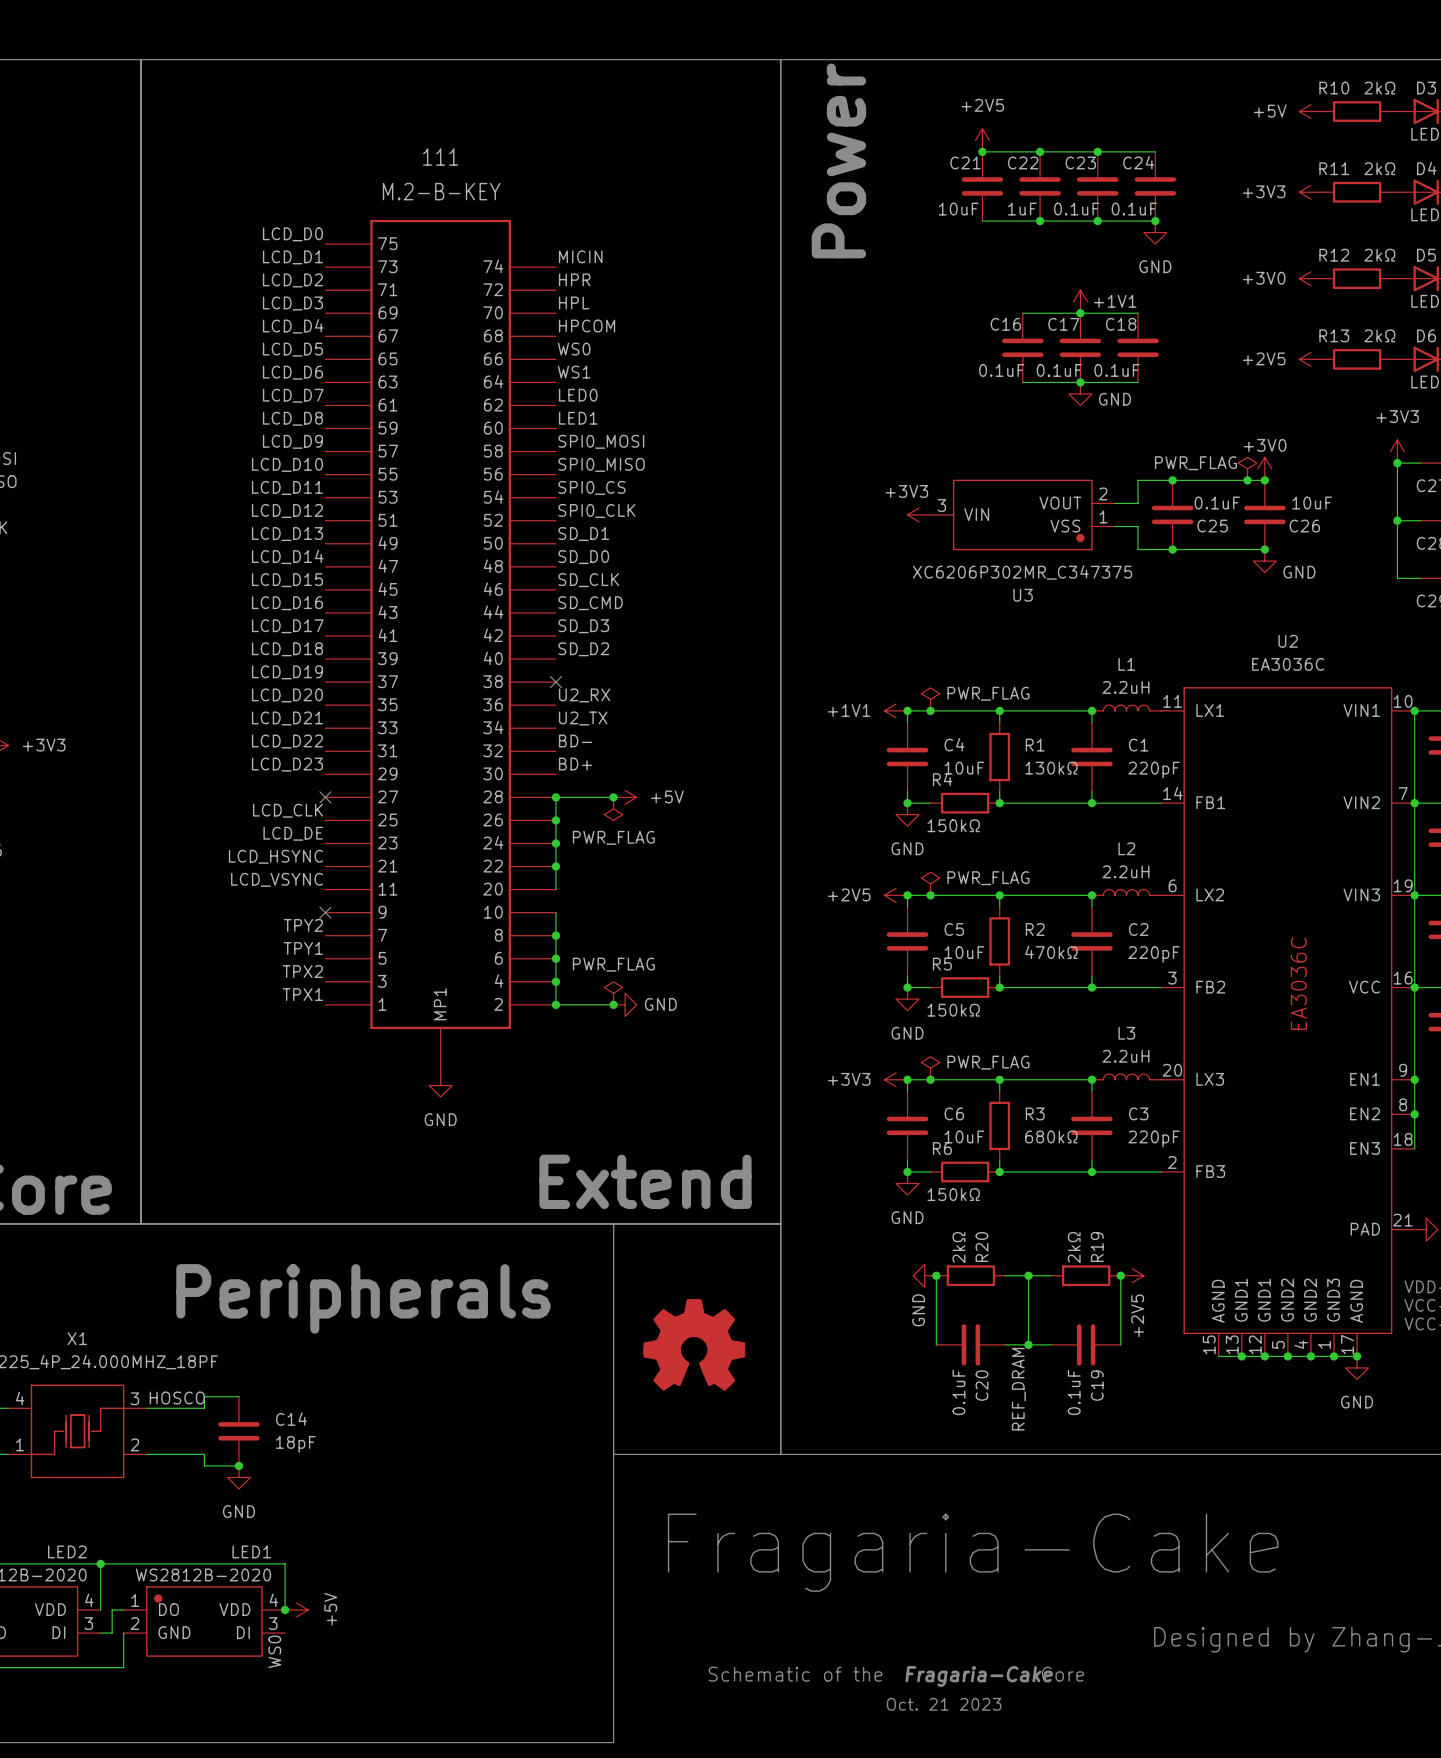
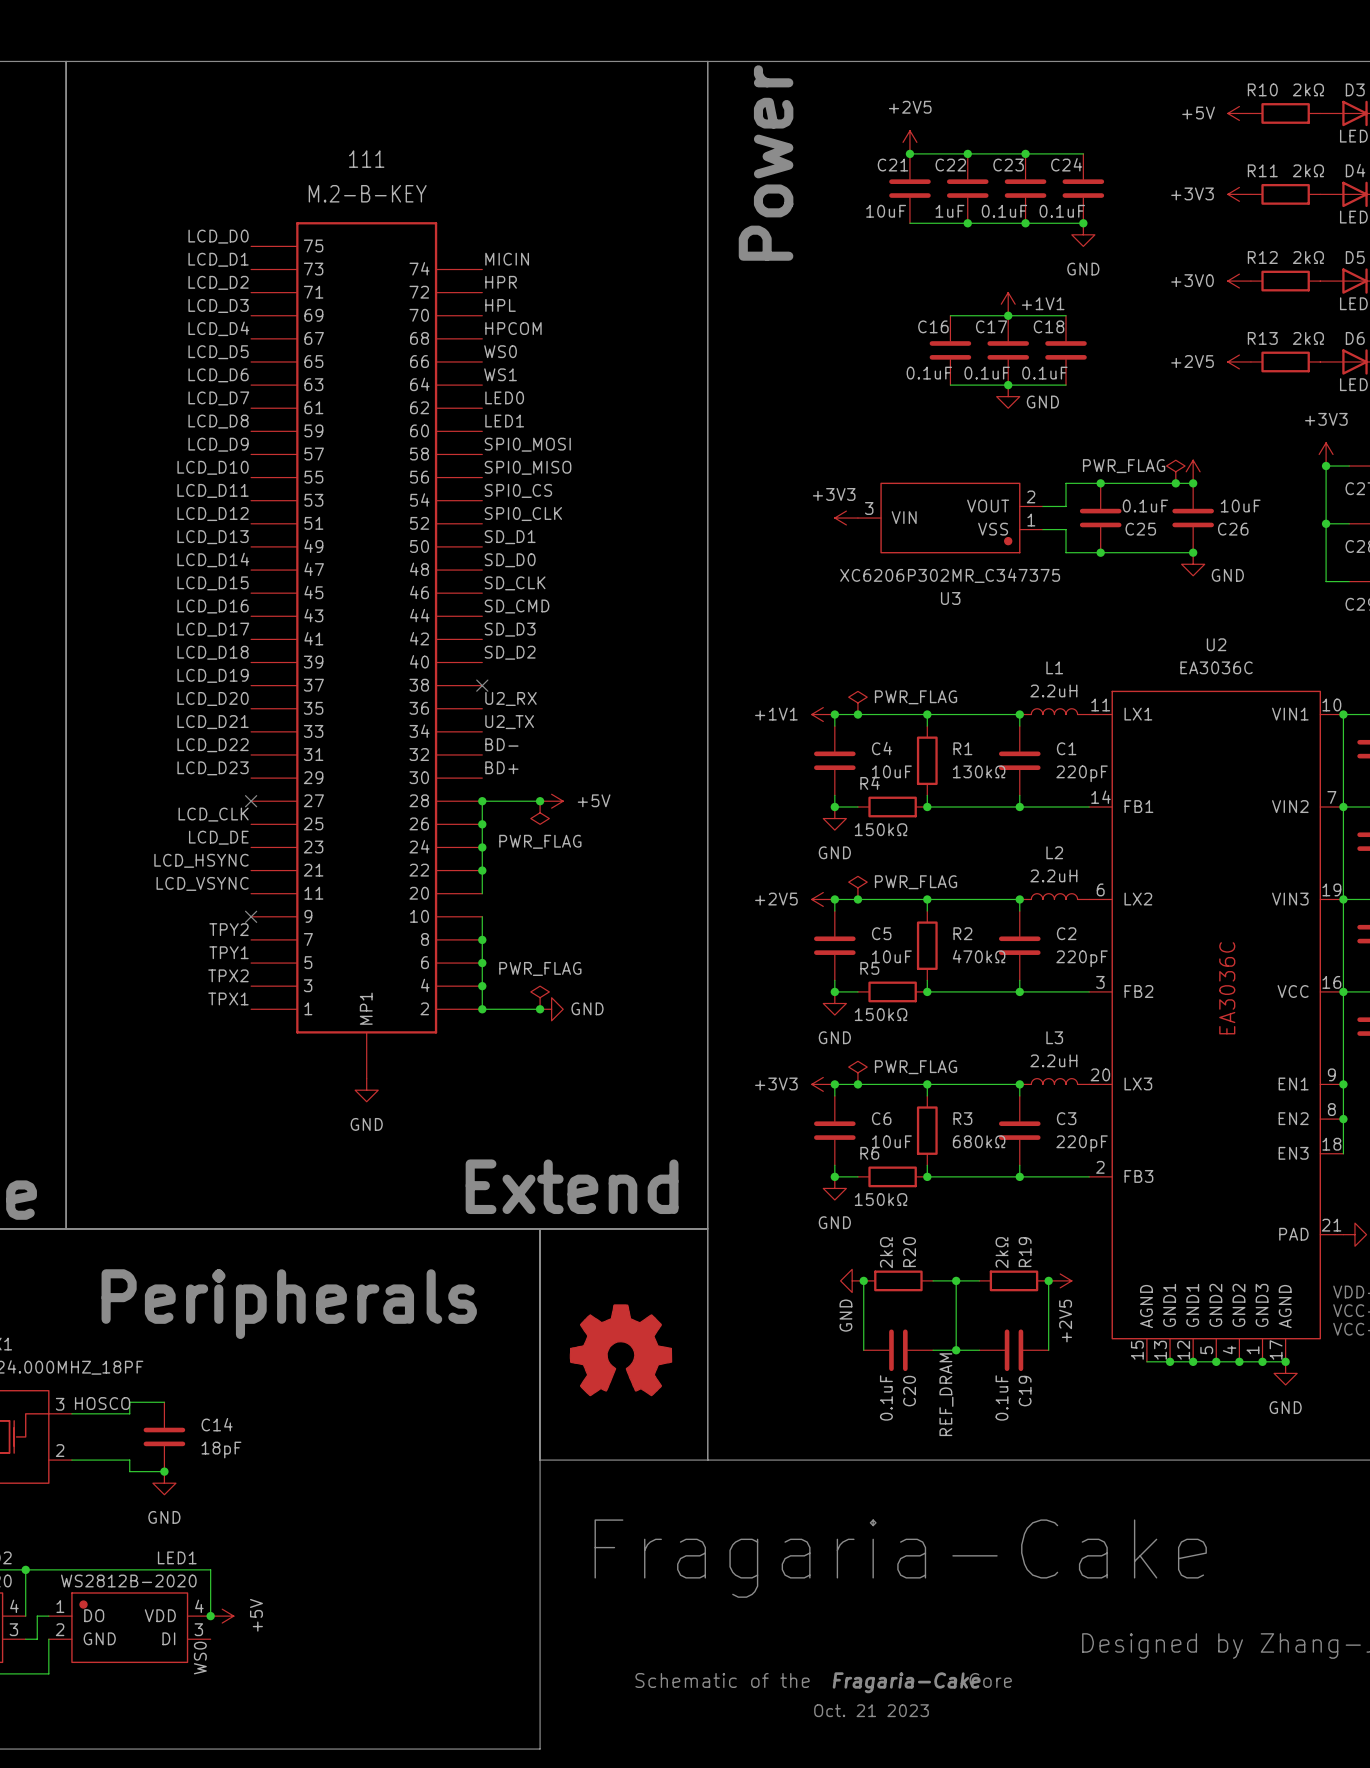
power symbol text: +3V0 (1265, 445) -> none

